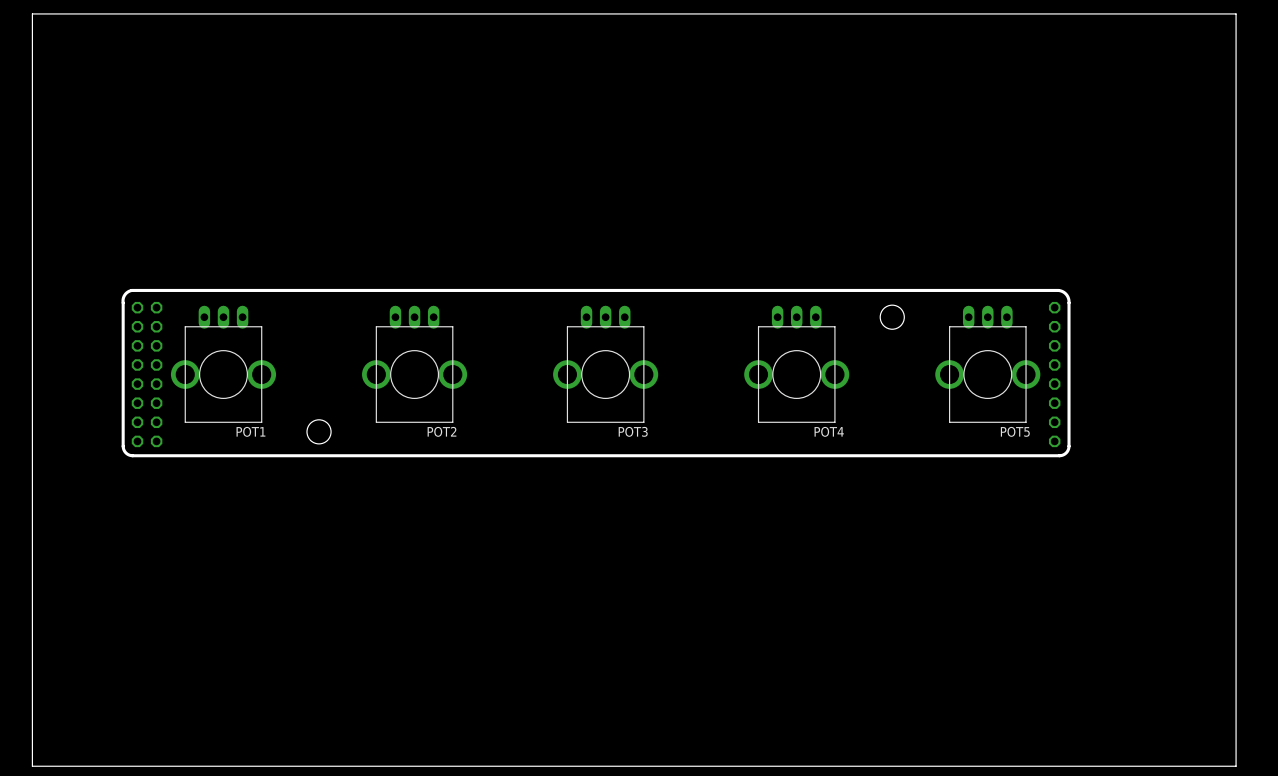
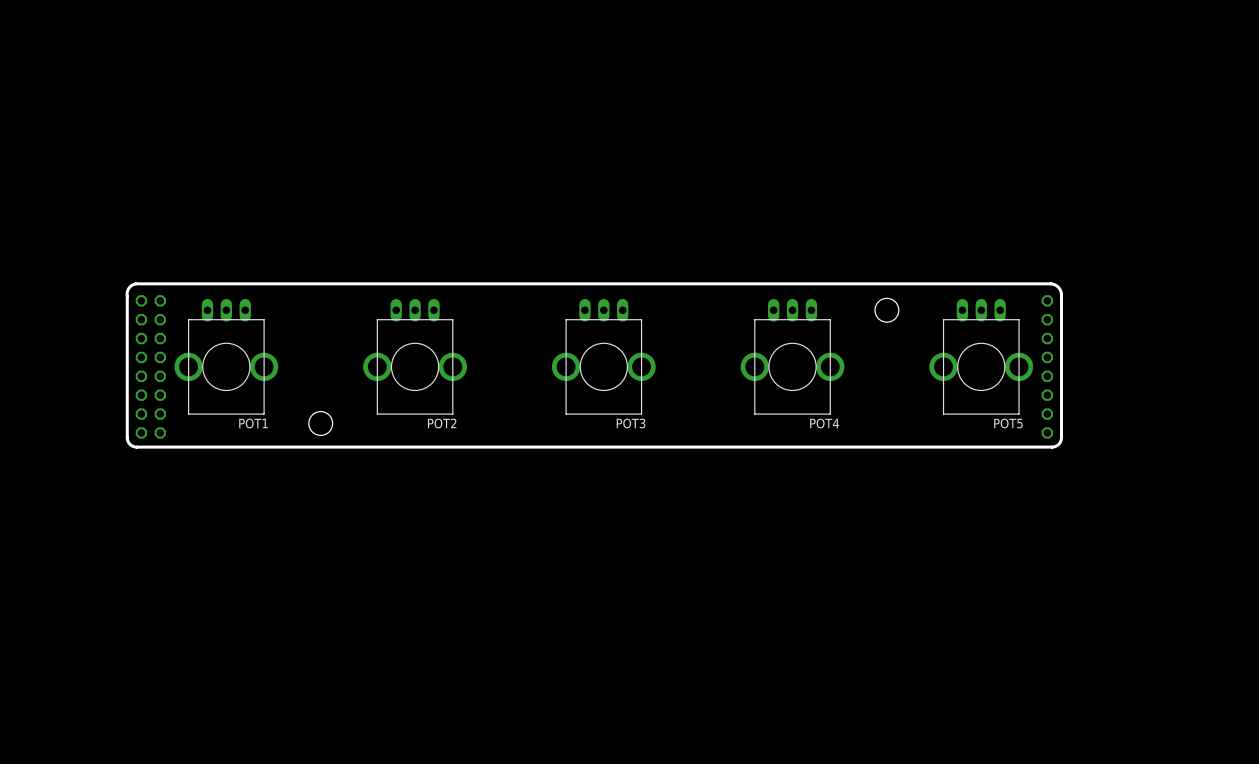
board edge: (32, 13) (1236, 13) (1236, 766) (32, 766) (32, 13) -> none

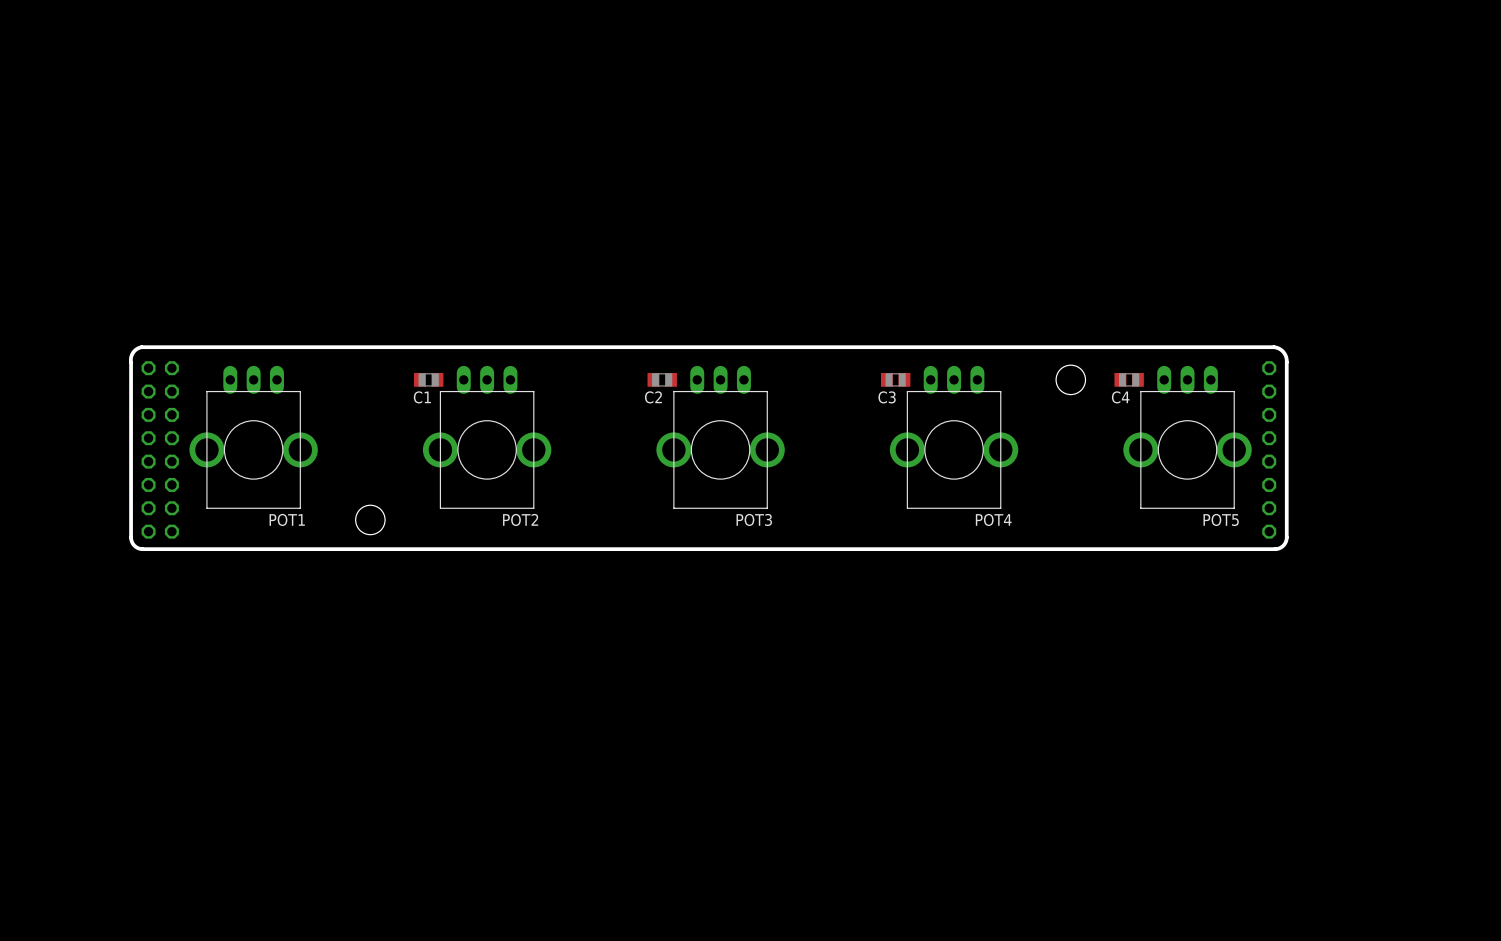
C1: none -> (428, 379)
C2: none -> (662, 379)
C3: none -> (895, 379)
C4: none -> (1129, 379)

